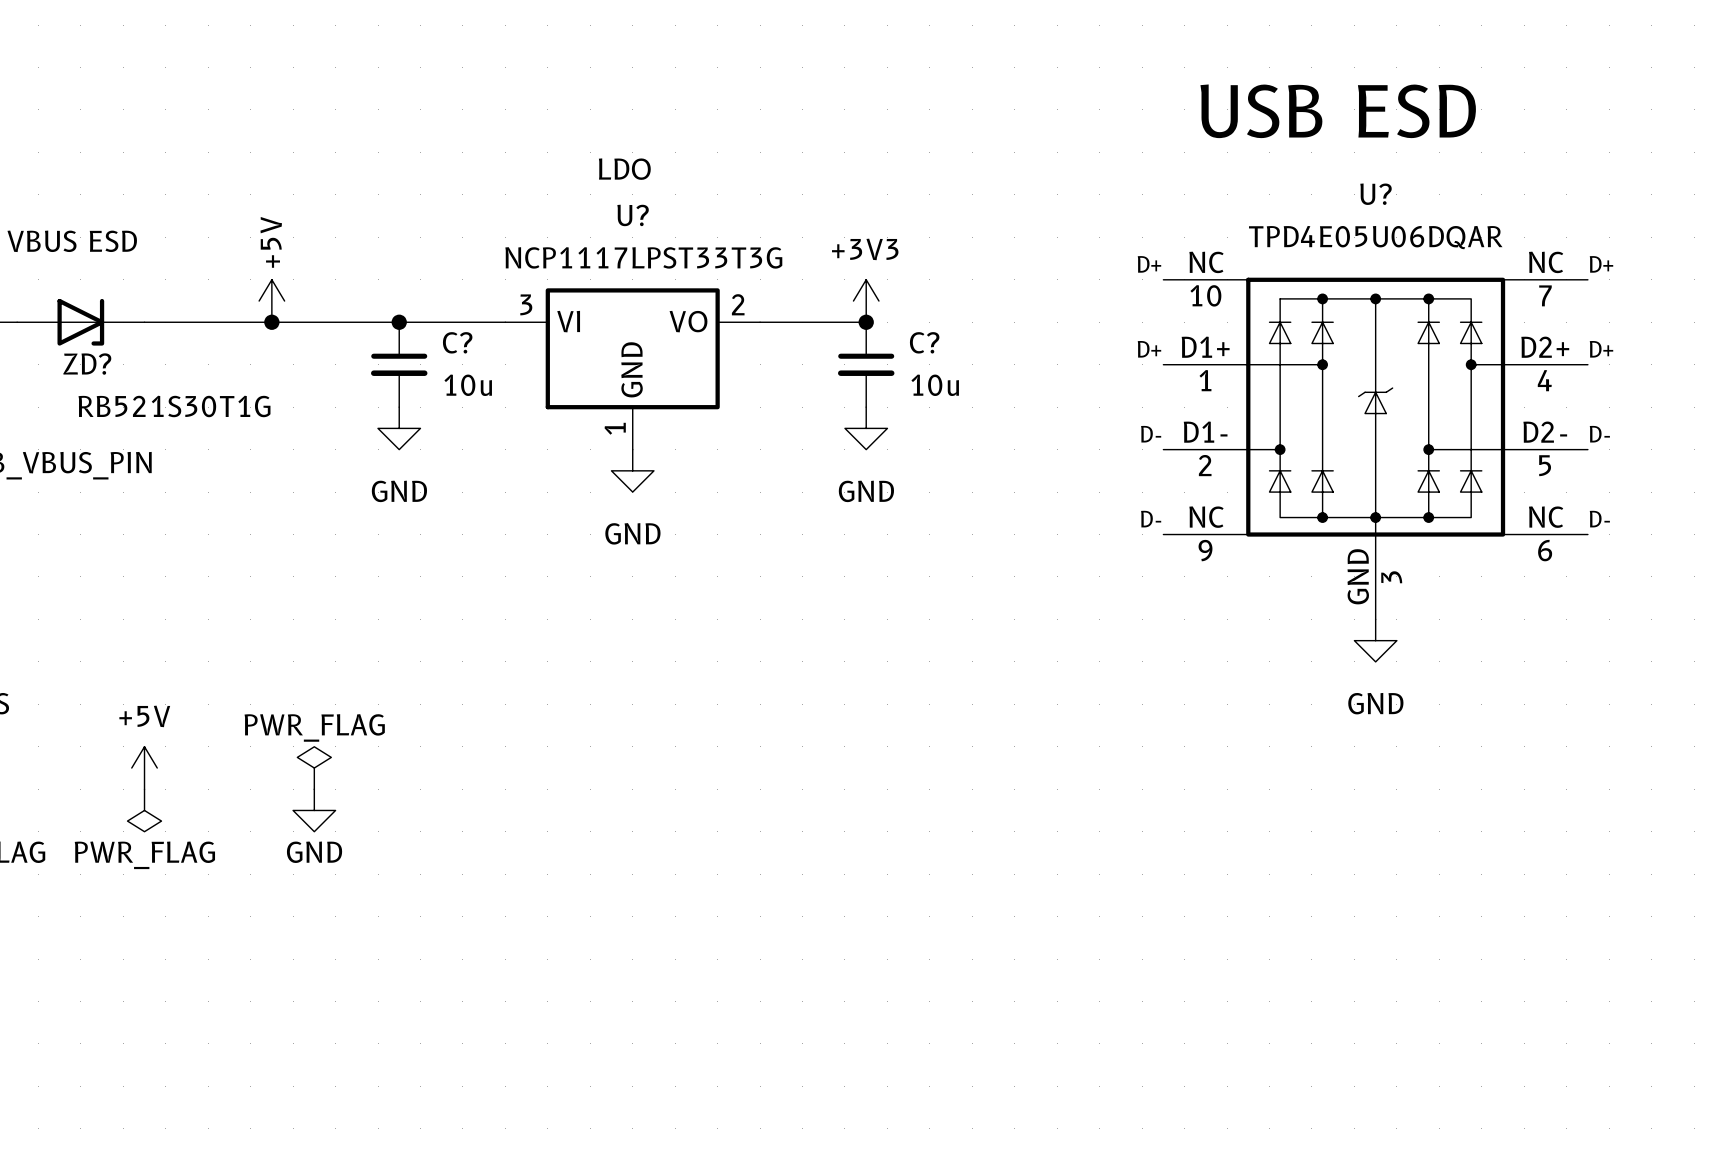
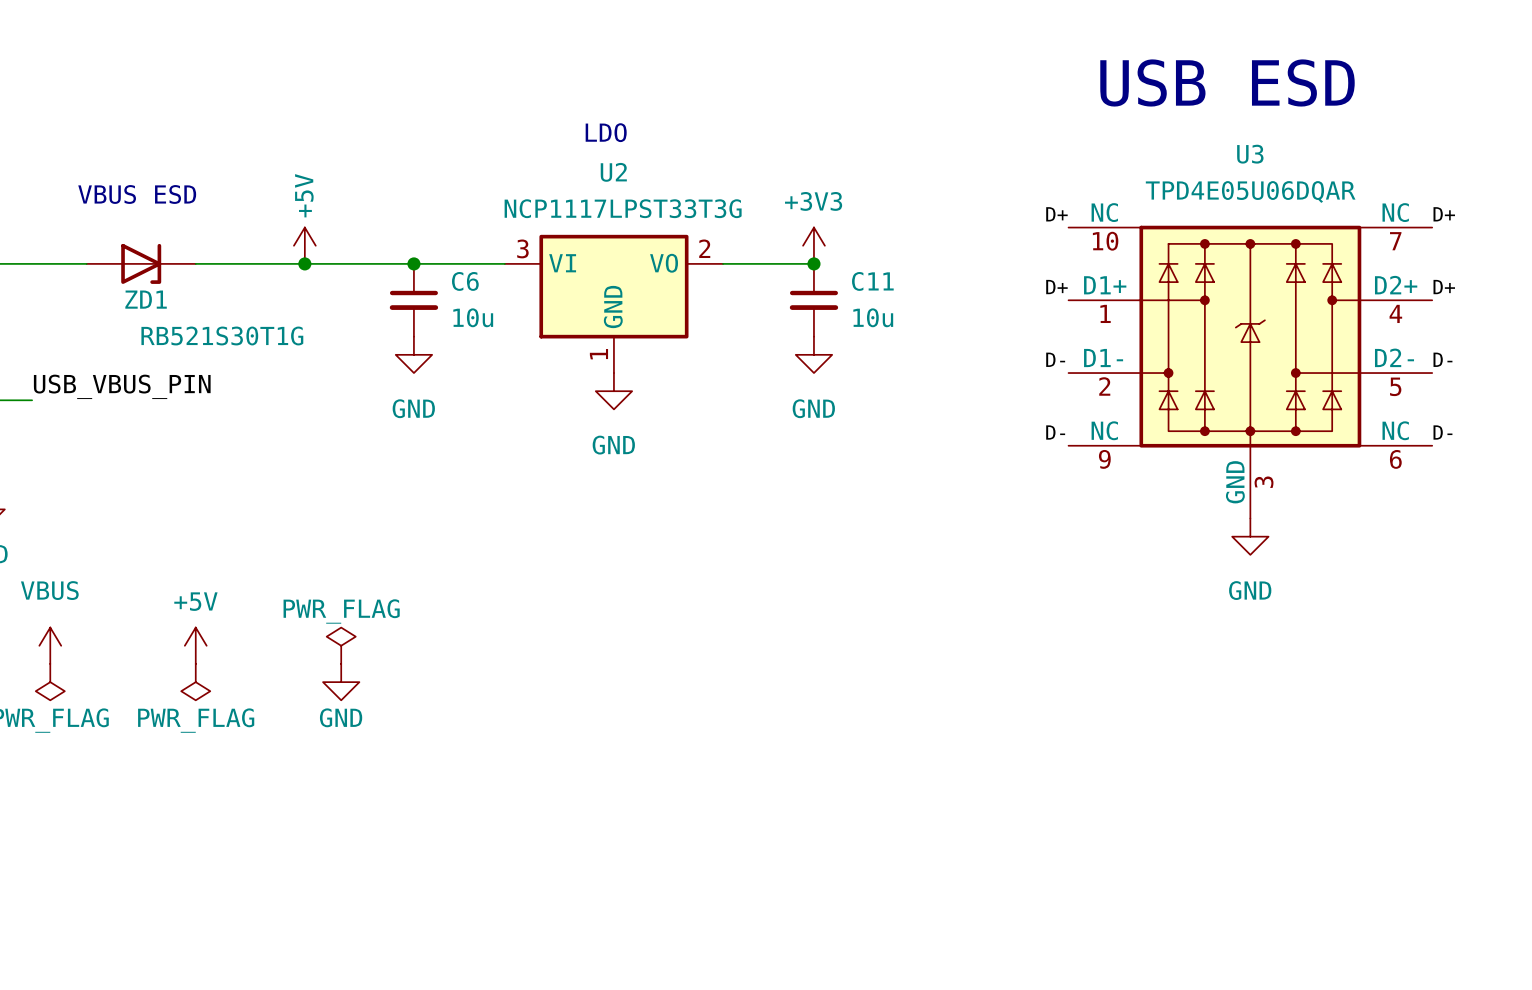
U? name: U? (1376, 194) -> U3 (1250, 154)
U? name: U? (633, 215) -> U2 (613, 172)
C? name: C? (457, 342) -> C6 (465, 281)
C? name: C? (924, 342) -> C11 (872, 281)
ZD? name: ZD? (87, 364) -> ZD1 (146, 299)

